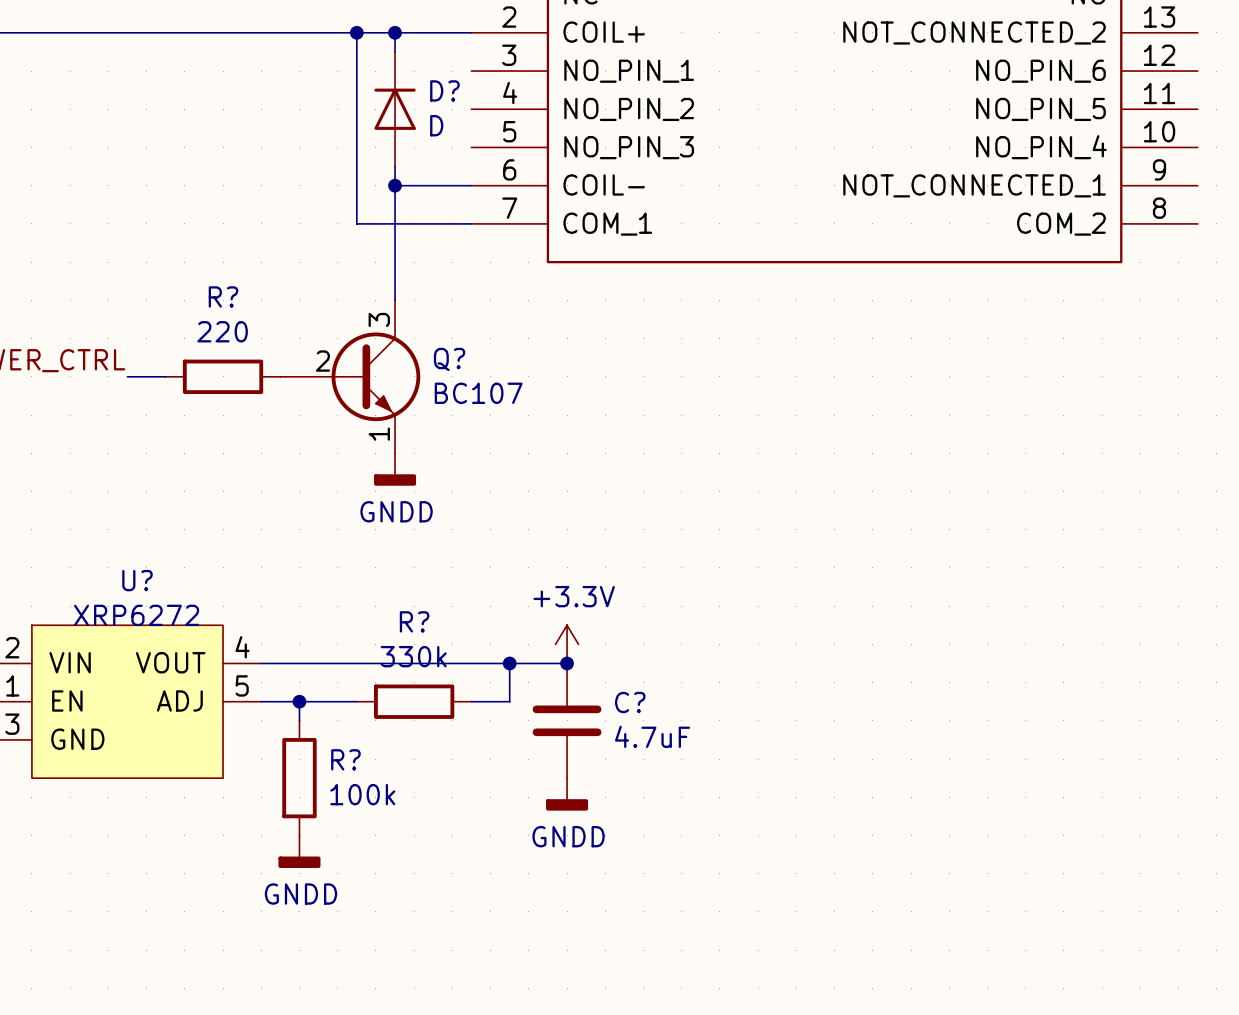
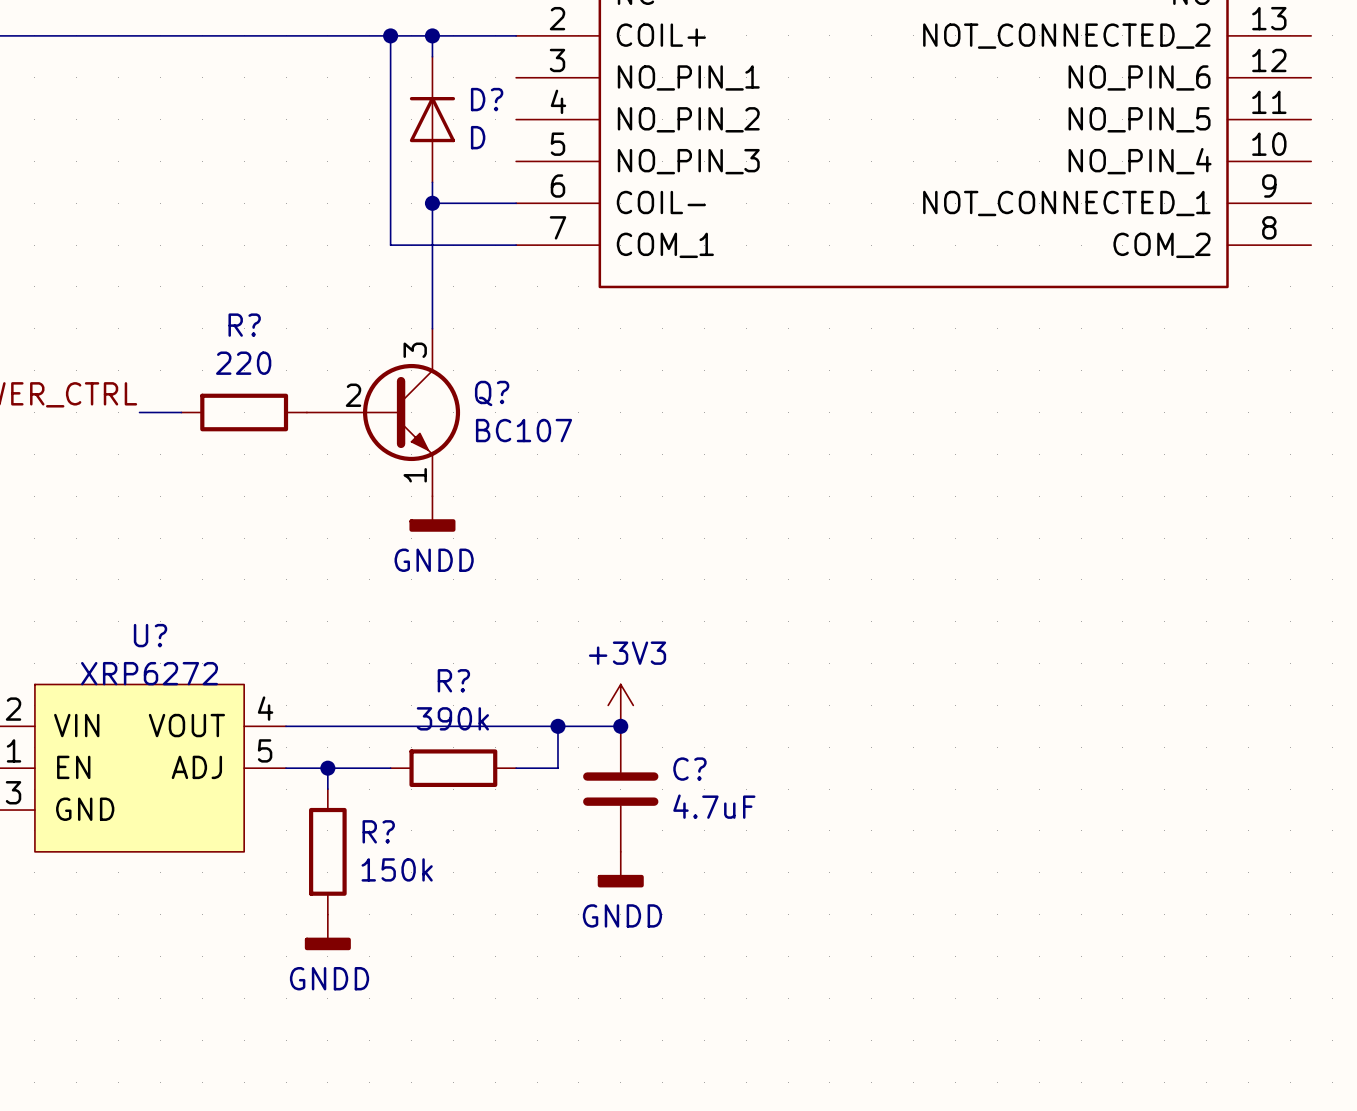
power symbol: +3.3V (567, 644) -> +3V3 (620, 705)
R? value: 330k (413, 656) -> 390k (452, 718)
R? value: 100k (362, 794) -> 150k (397, 869)

